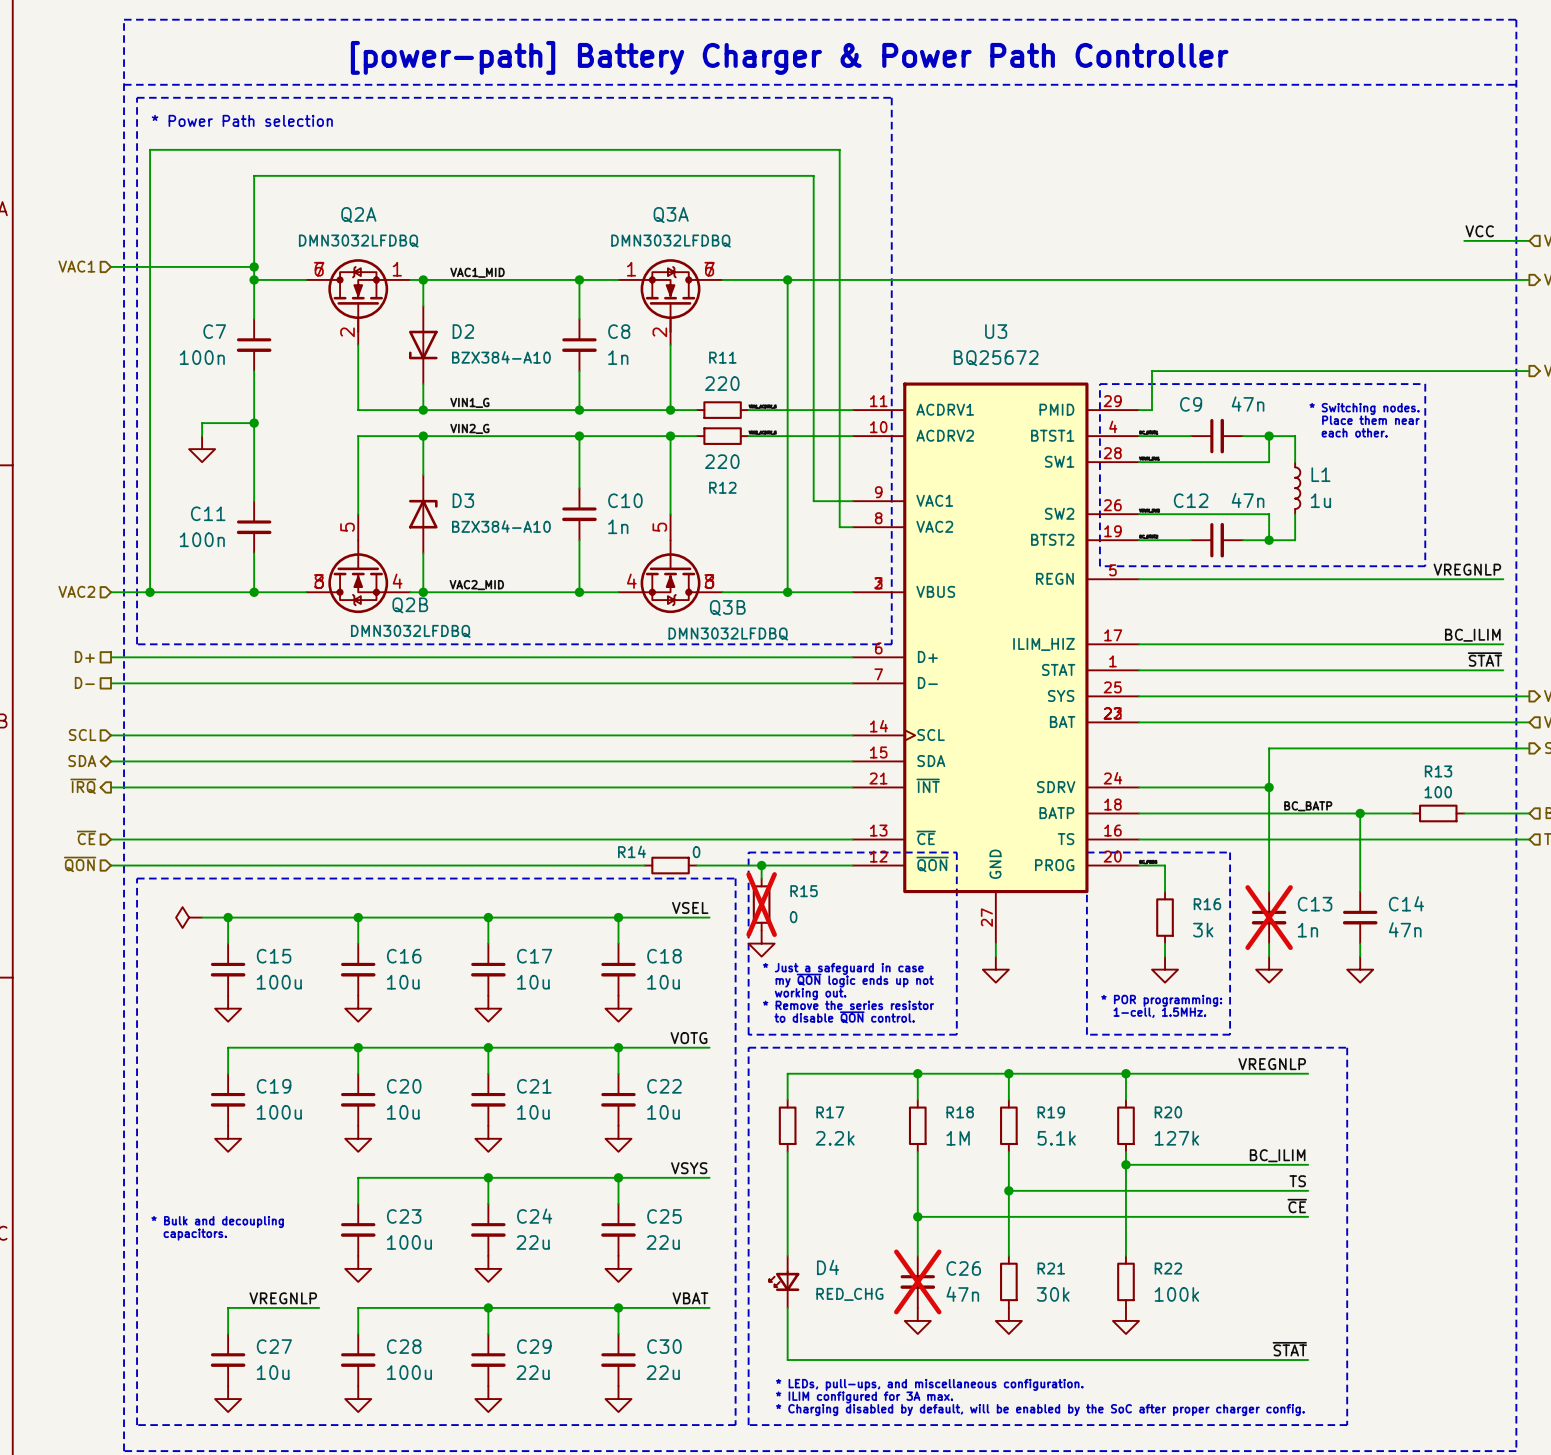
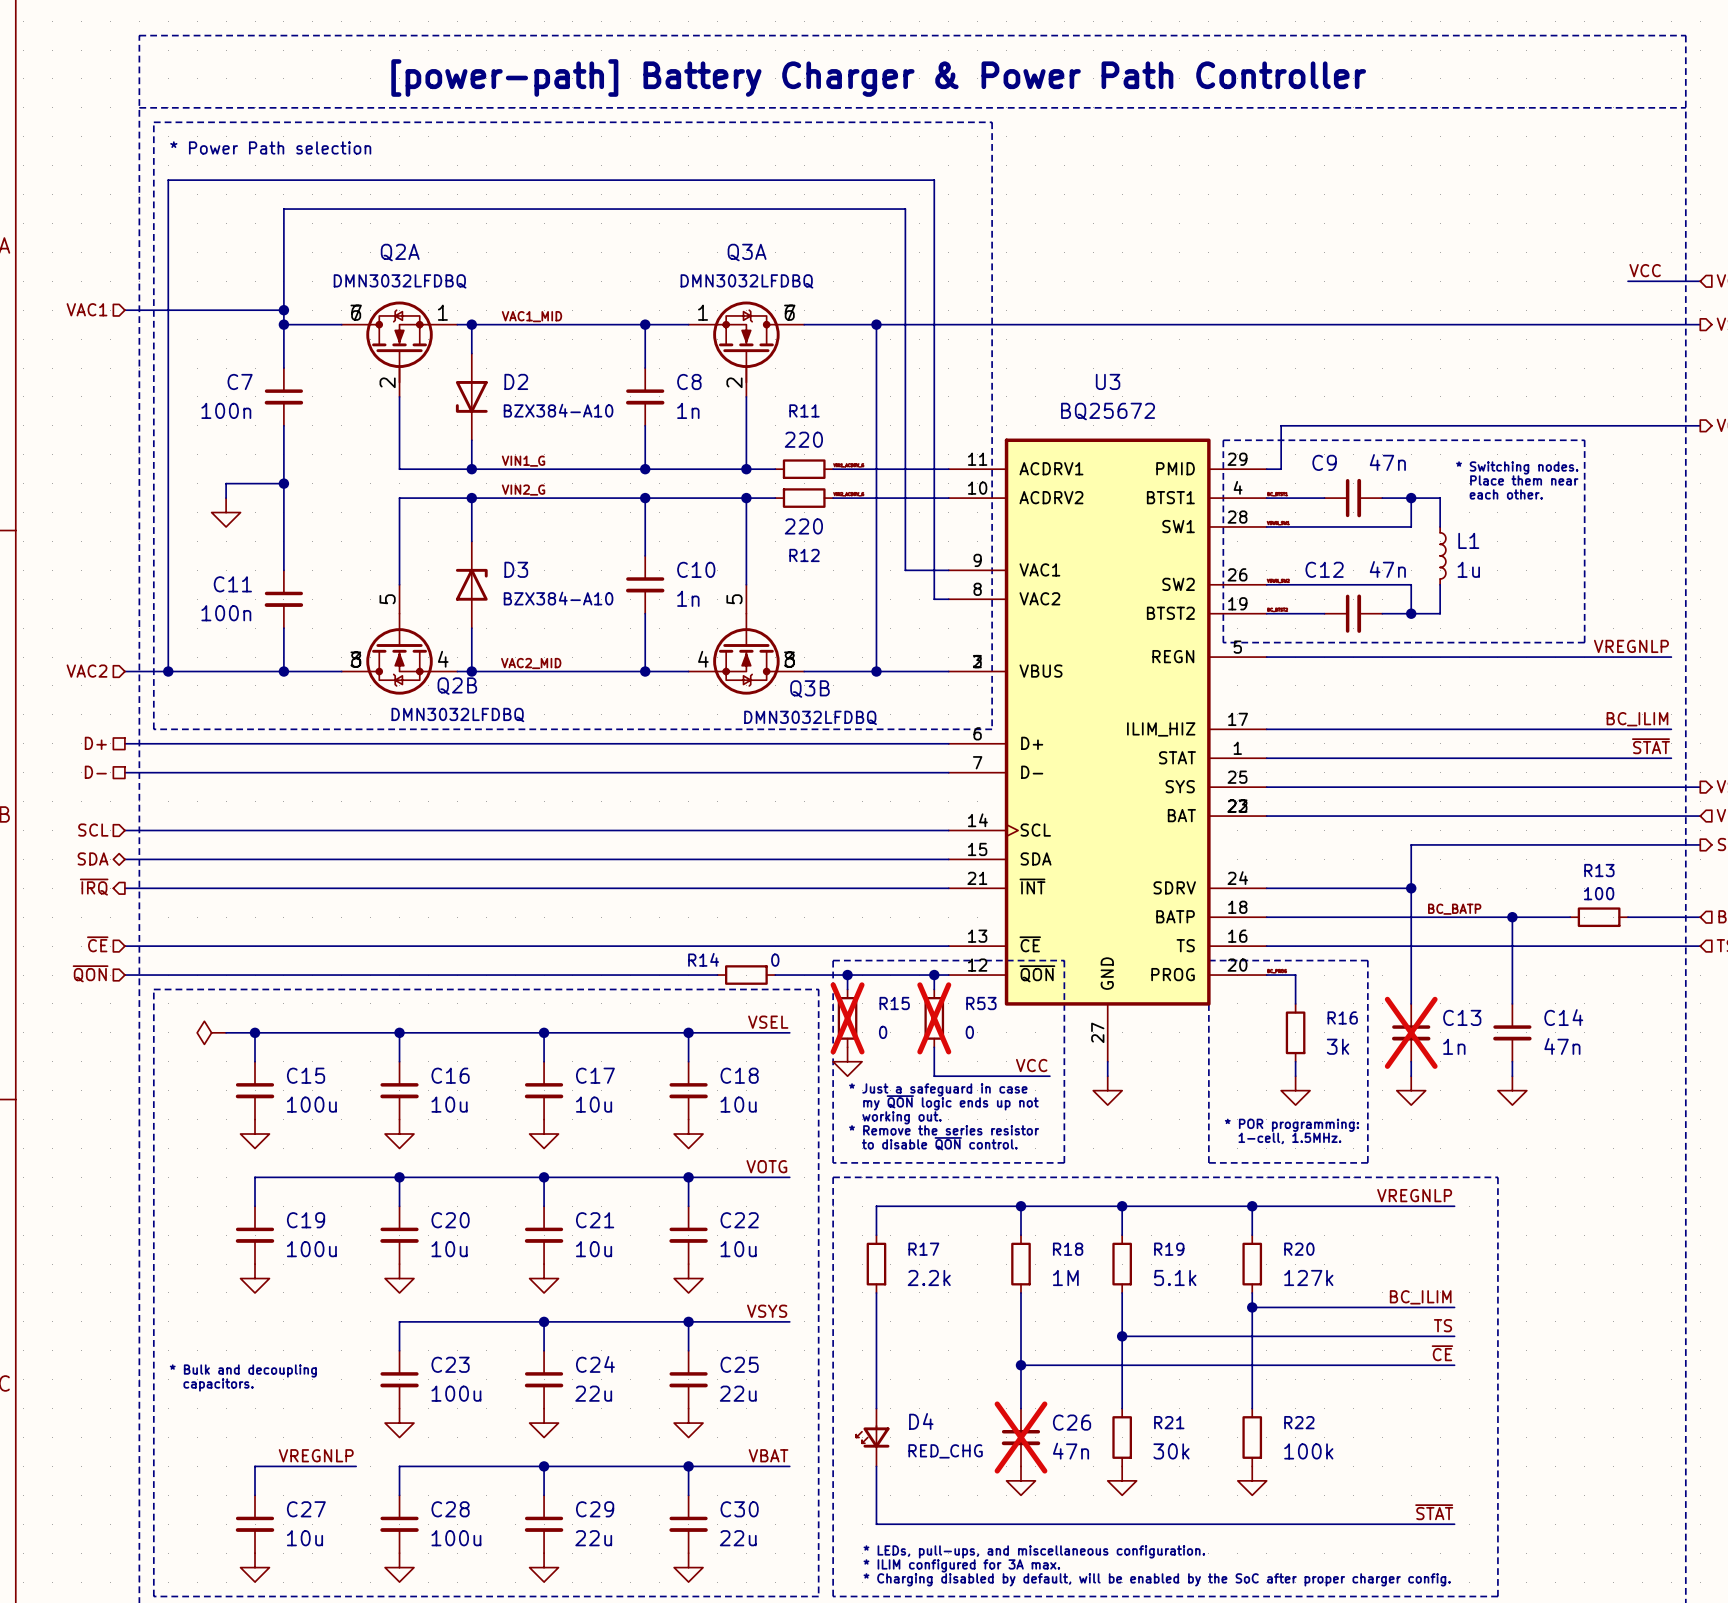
wire: none -> (934, 975) (934, 989)
junction: none -> (934, 975)
R53: none -> 0 (934, 1018)
wire: none -> (934, 1047) (934, 1076) (1049, 1076)
label: none -> VCC (1031, 1065)

